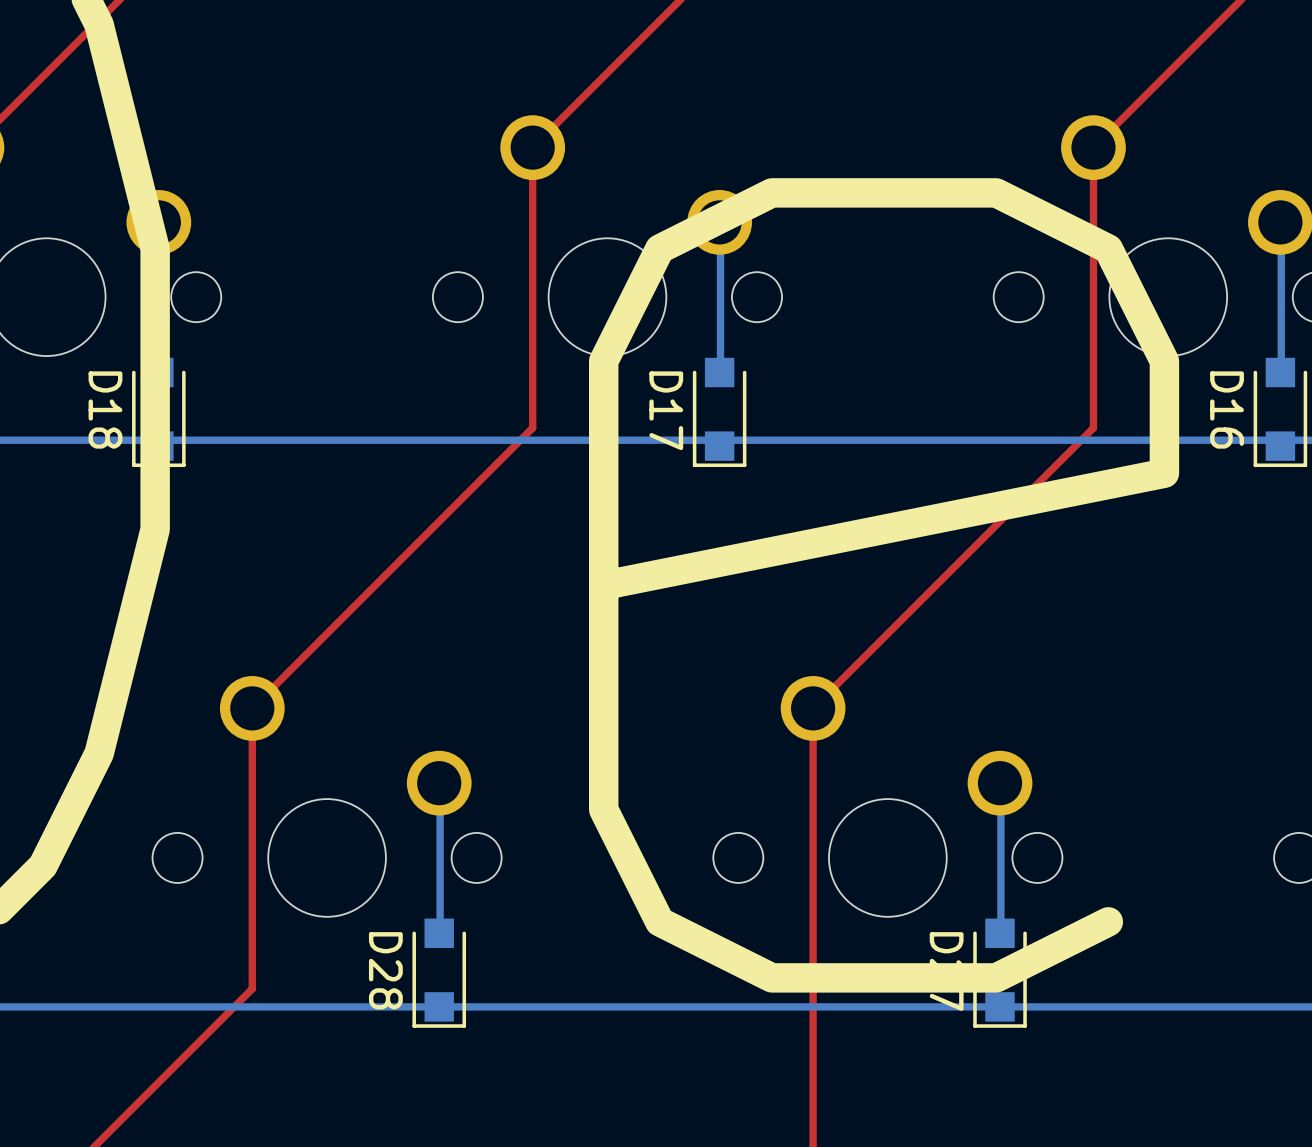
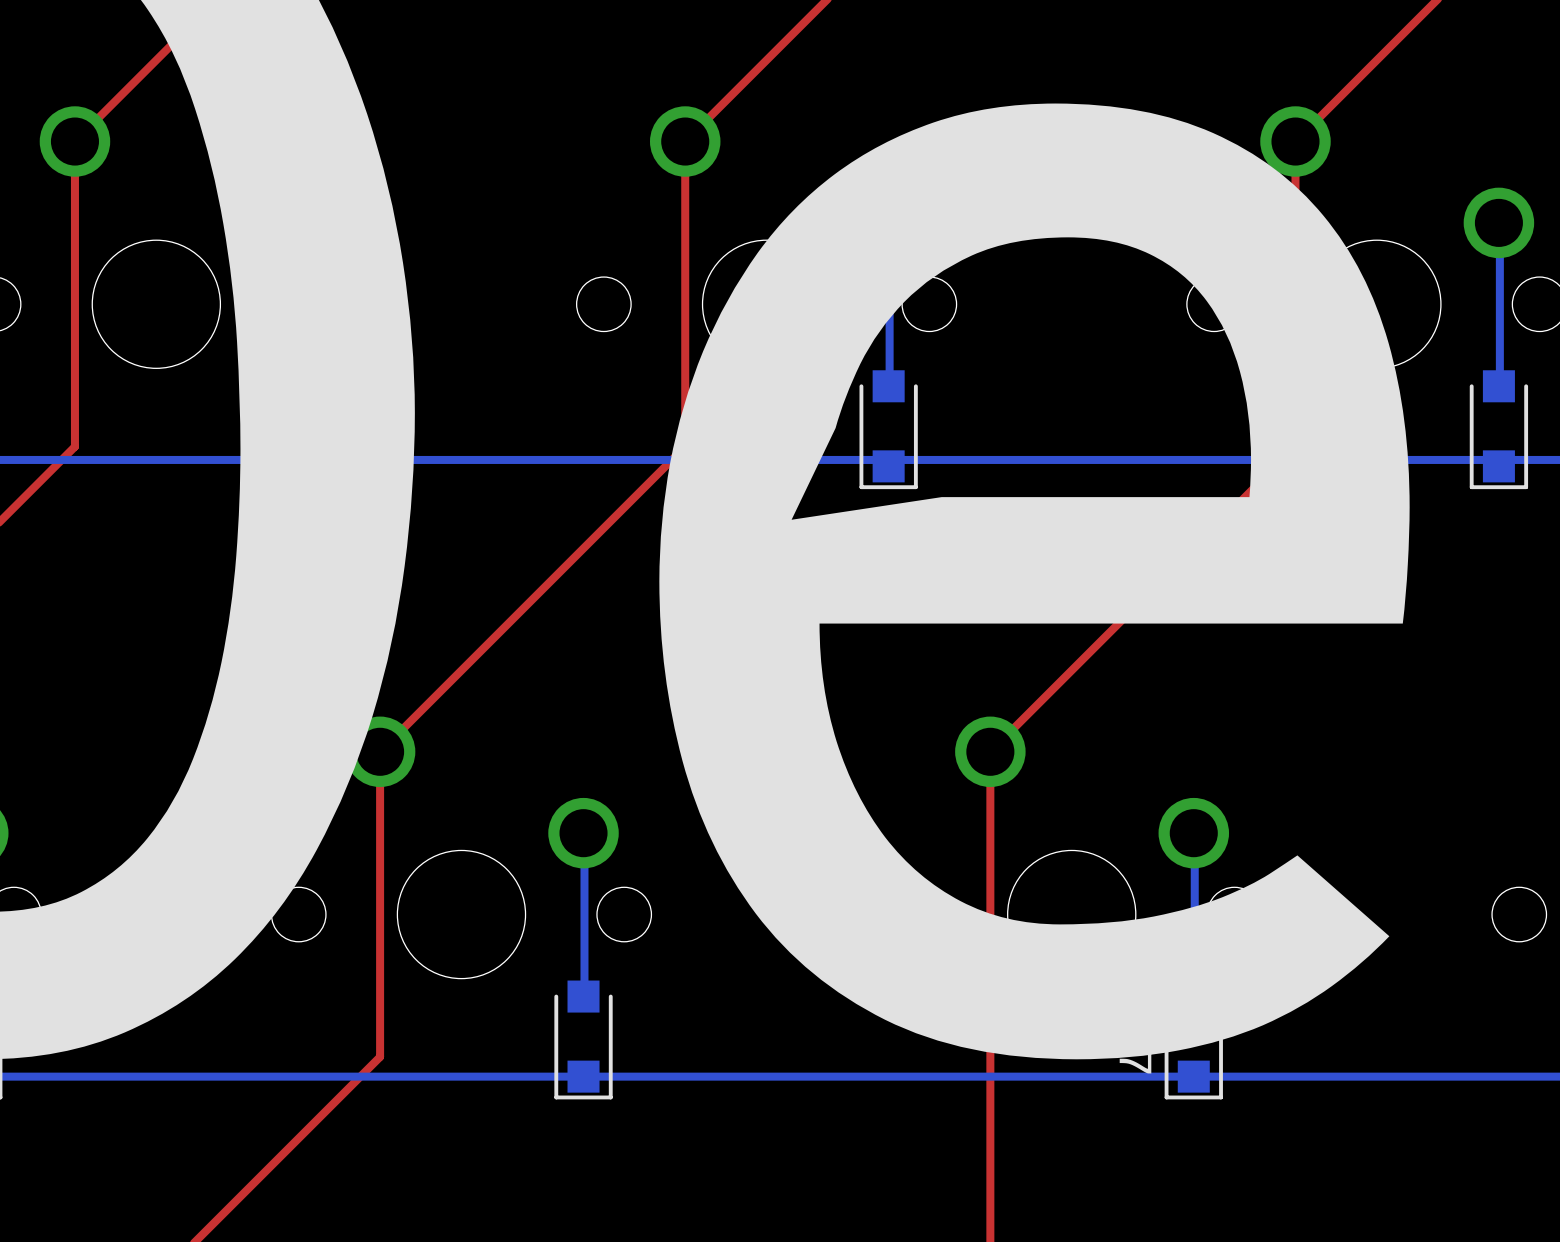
D18 name: D18 (105, 410) -> none
D17 name: D17 (666, 410) -> none
D16 name: D16 (1227, 410) -> none
D28 name: D28 (385, 970) -> none

